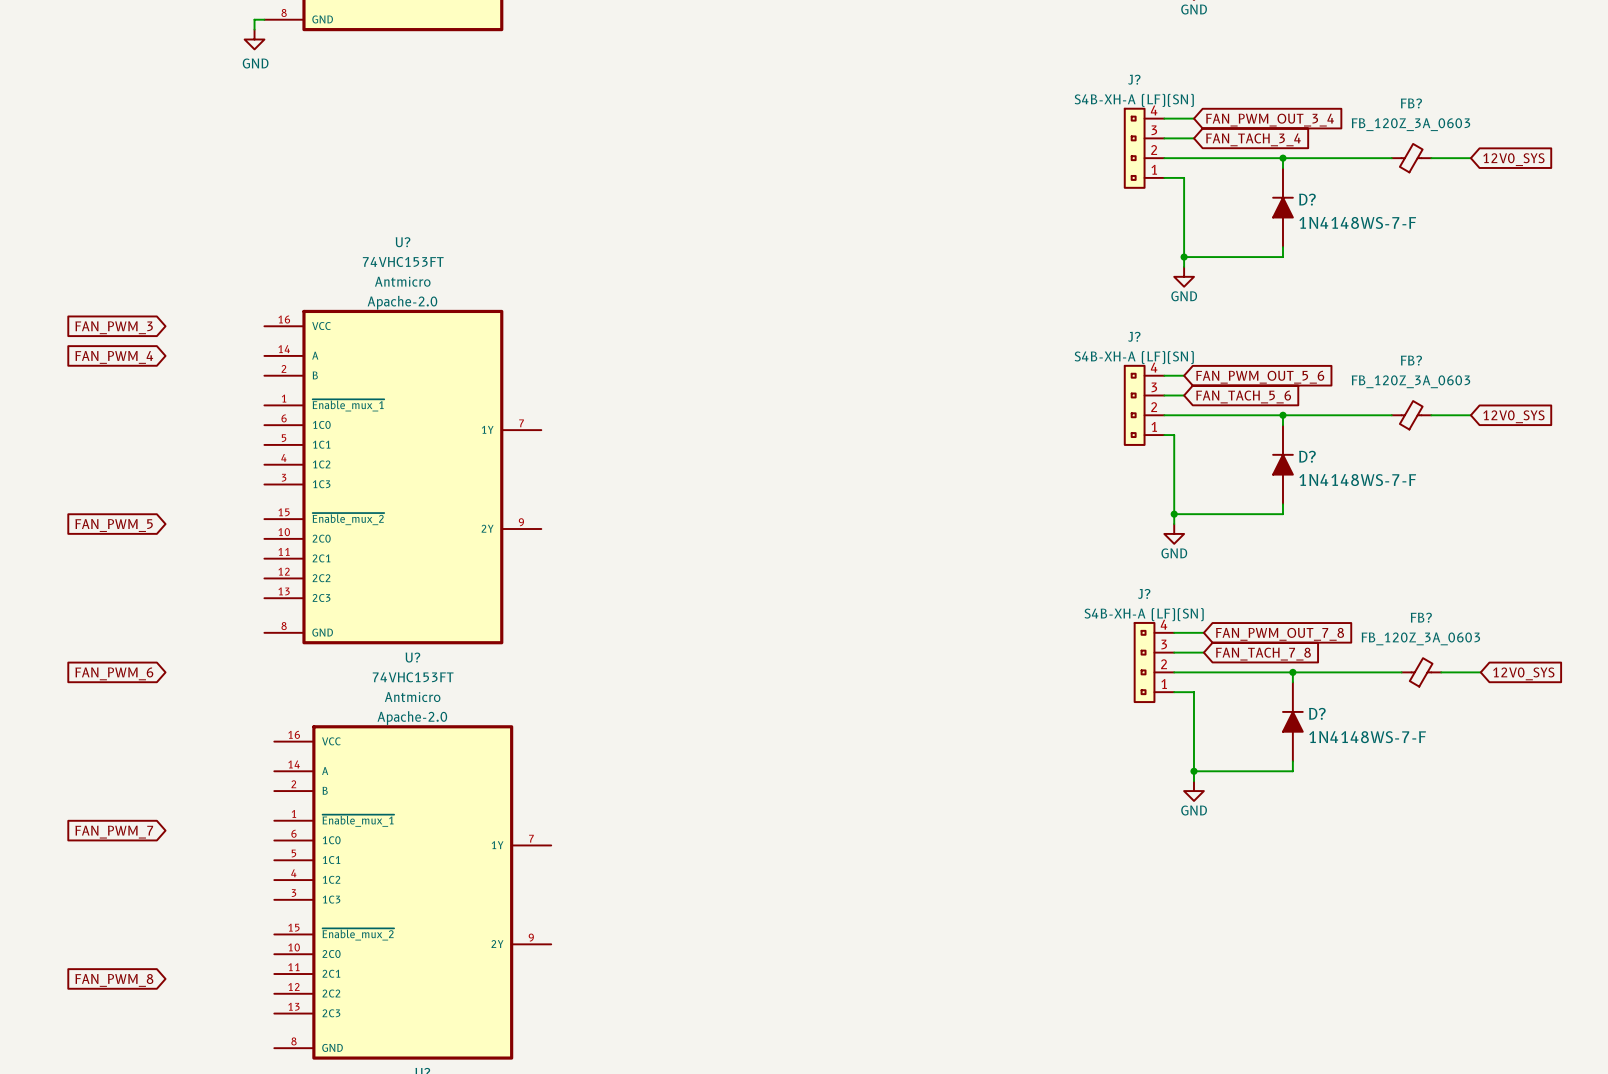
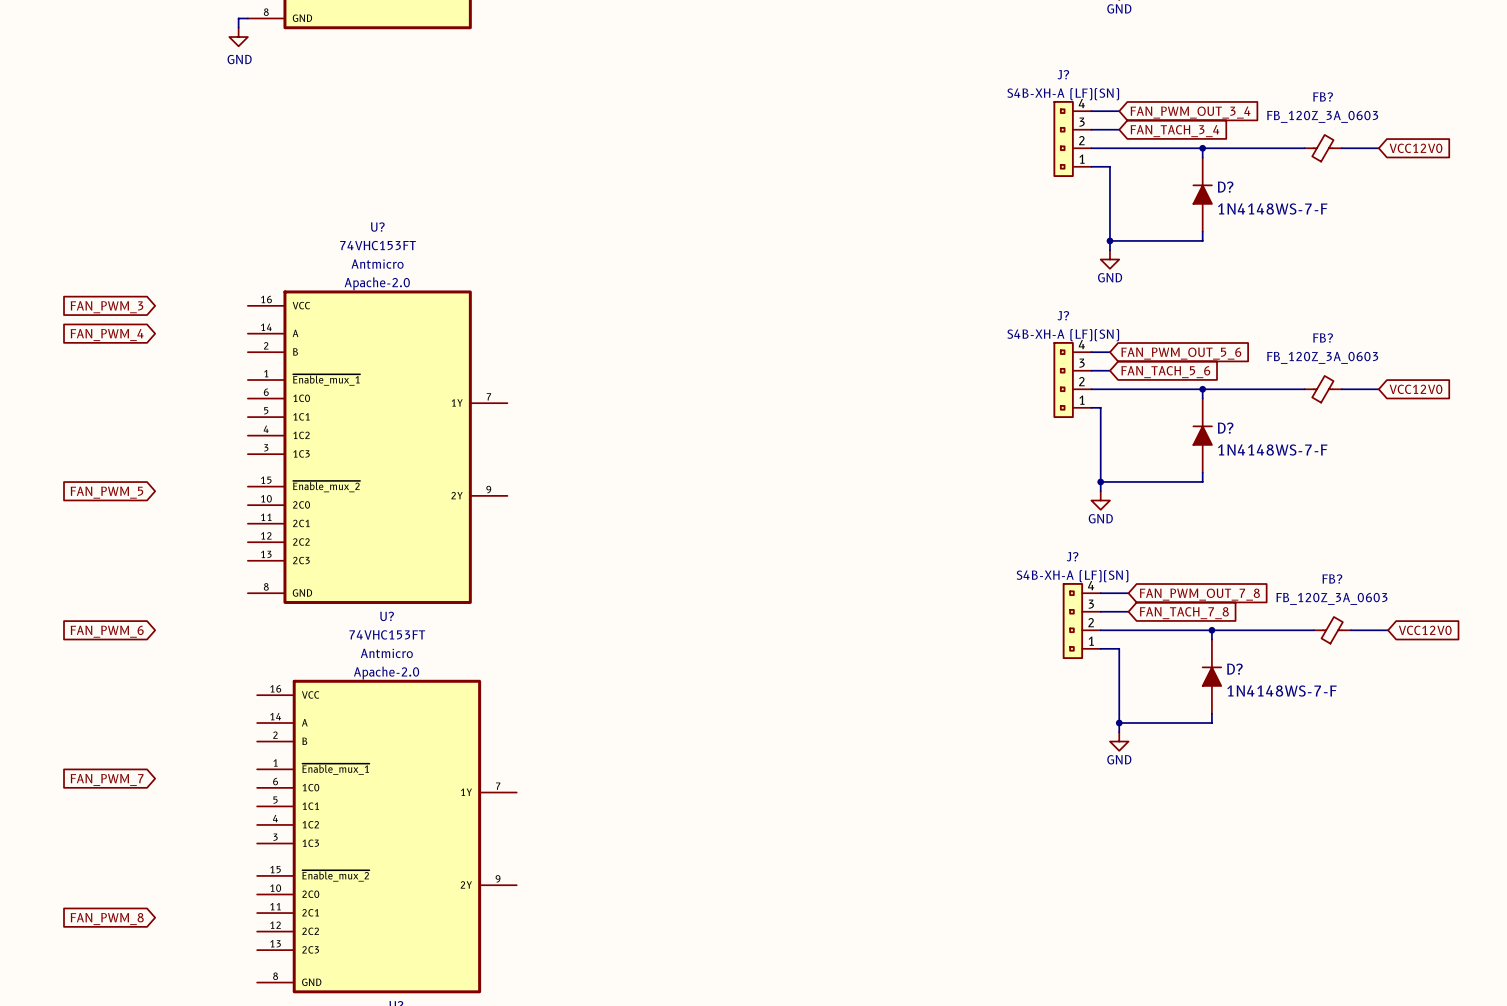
global label: 12V0_SYS (1513, 159) -> VCC12V0 (1416, 148)
global label: 12V0_SYS (1513, 416) -> VCC12V0 (1416, 389)
global label: 12V0_SYS (1523, 673) -> VCC12V0 (1425, 630)

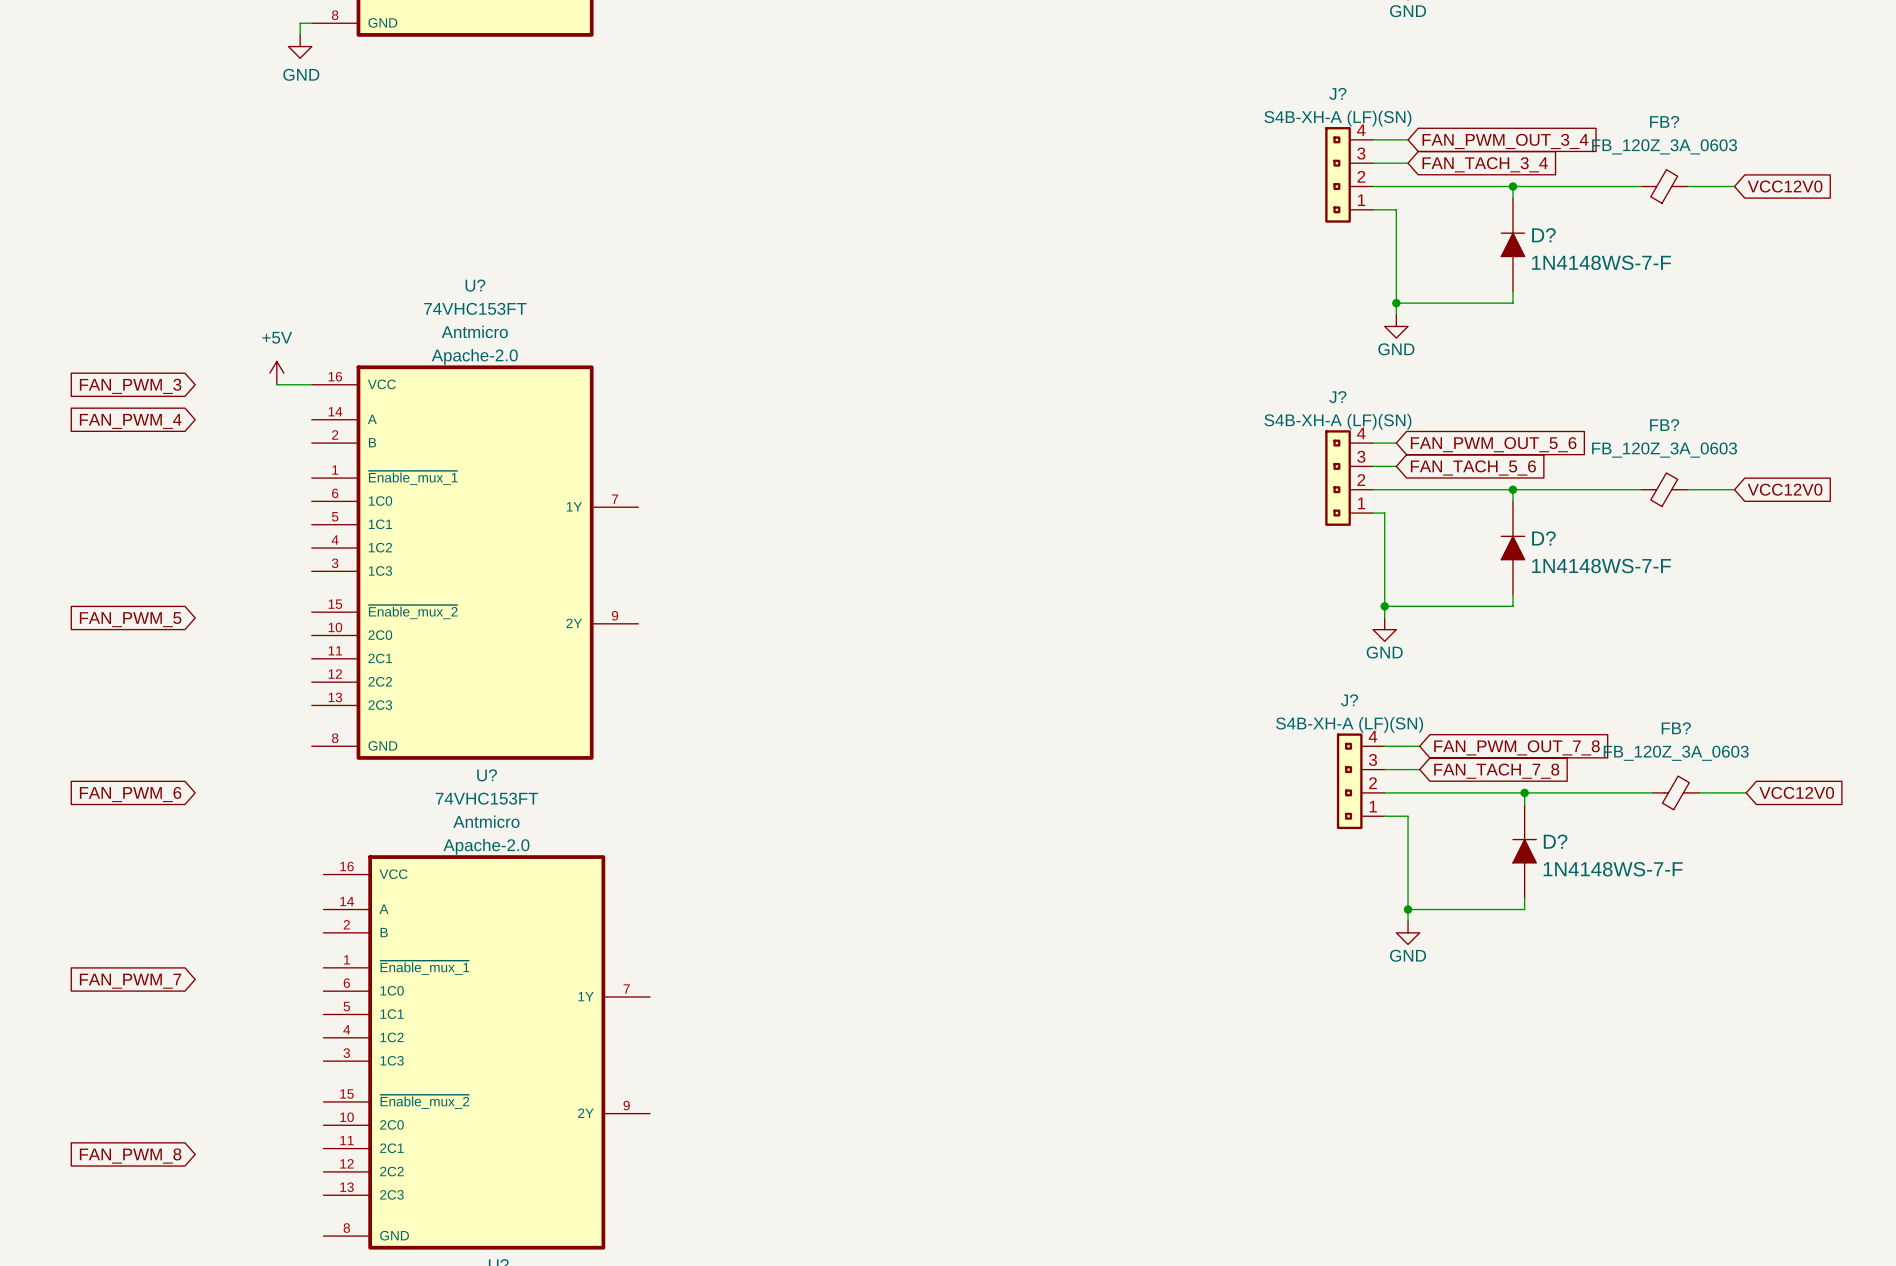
power symbol: none -> +5V (276, 373)
wire: none -> (276, 384) (311, 384)

